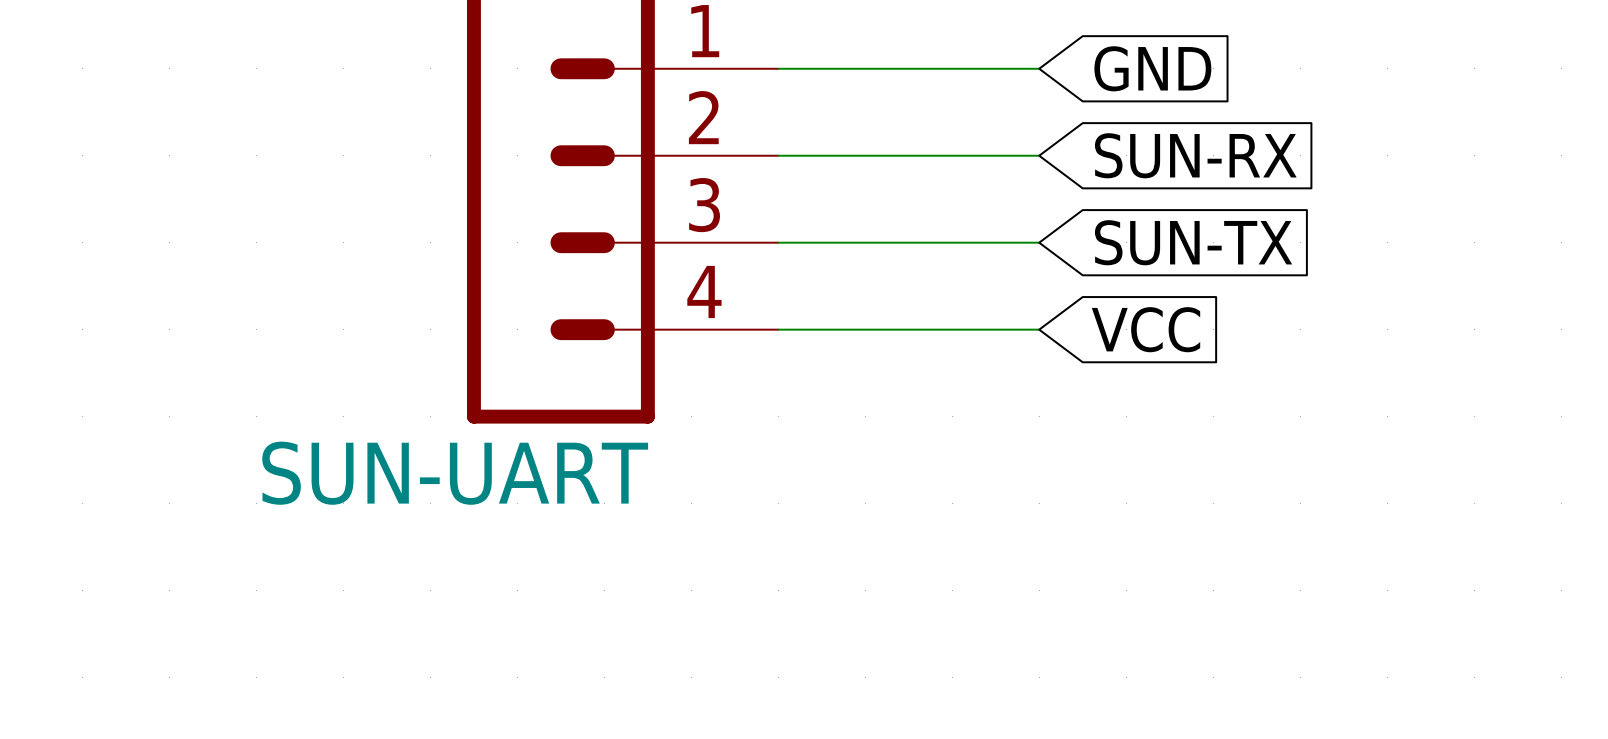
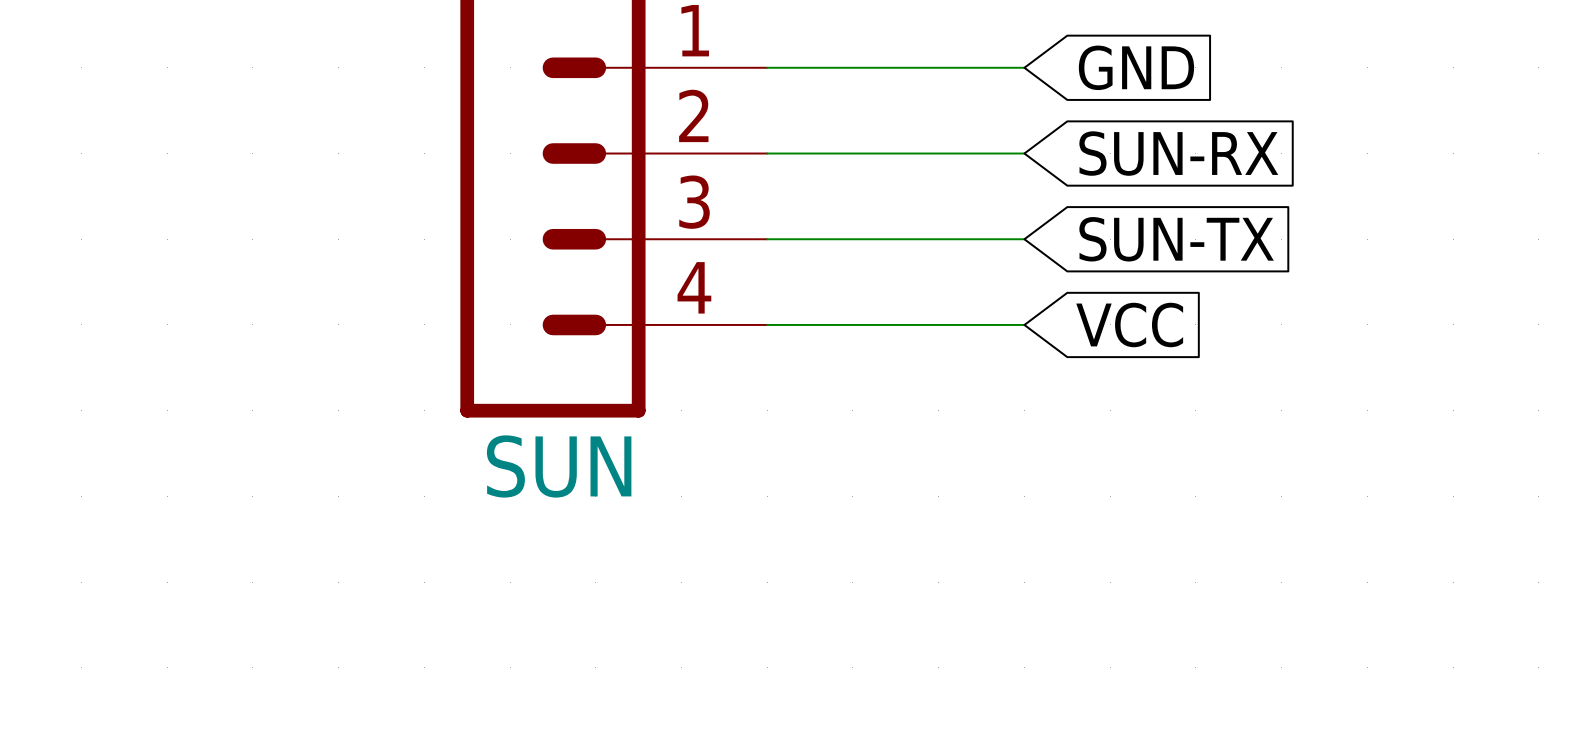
part value: SUN-UART (455, 473) -> SUN (559, 466)

